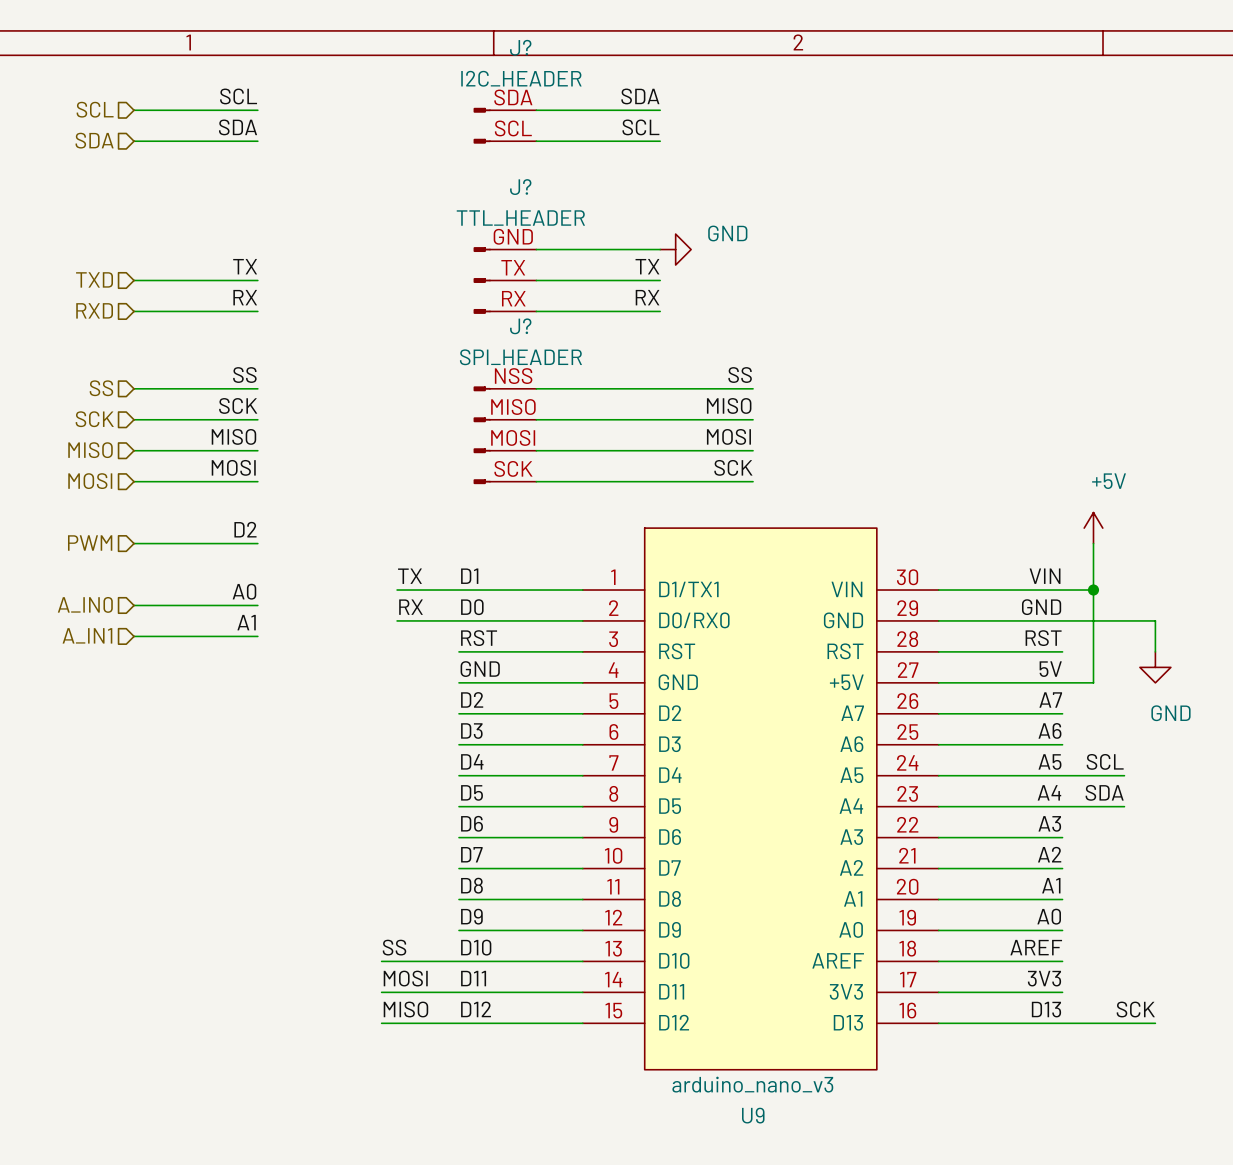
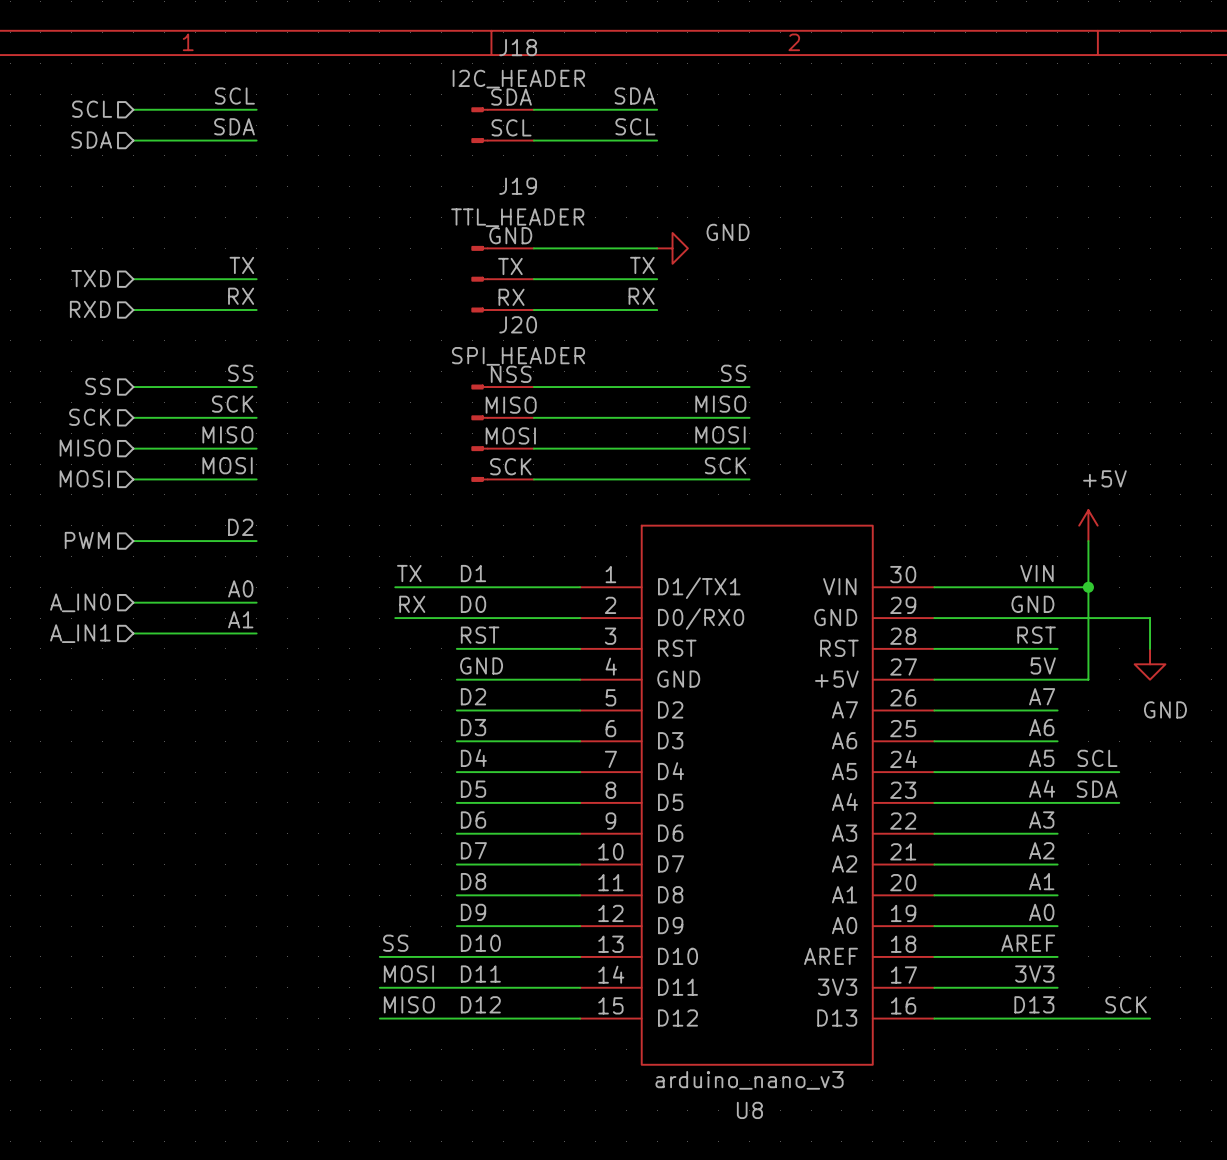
J? name: J? (520, 47) -> J18 (518, 47)
J? name: J? (520, 187) -> J19 (518, 186)
J? name: J? (520, 326) -> J20 (518, 324)
U9 name: U9 (753, 1115) -> U8 (749, 1110)

